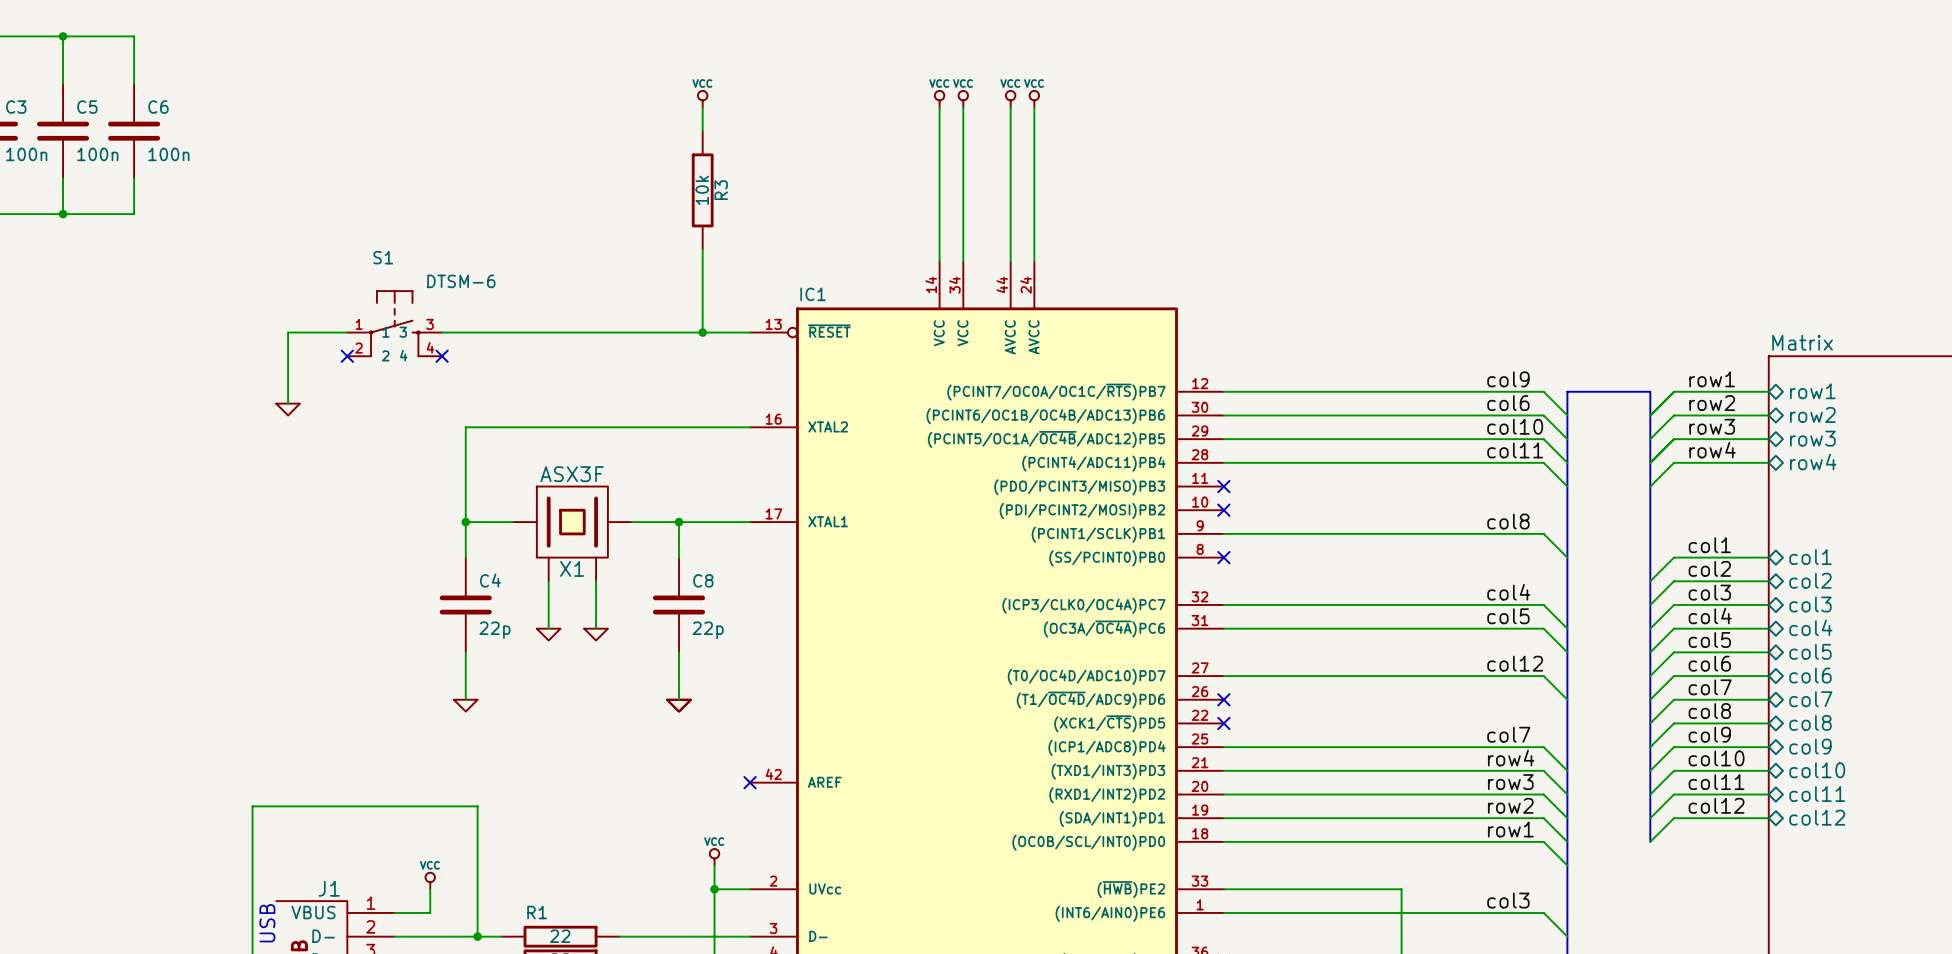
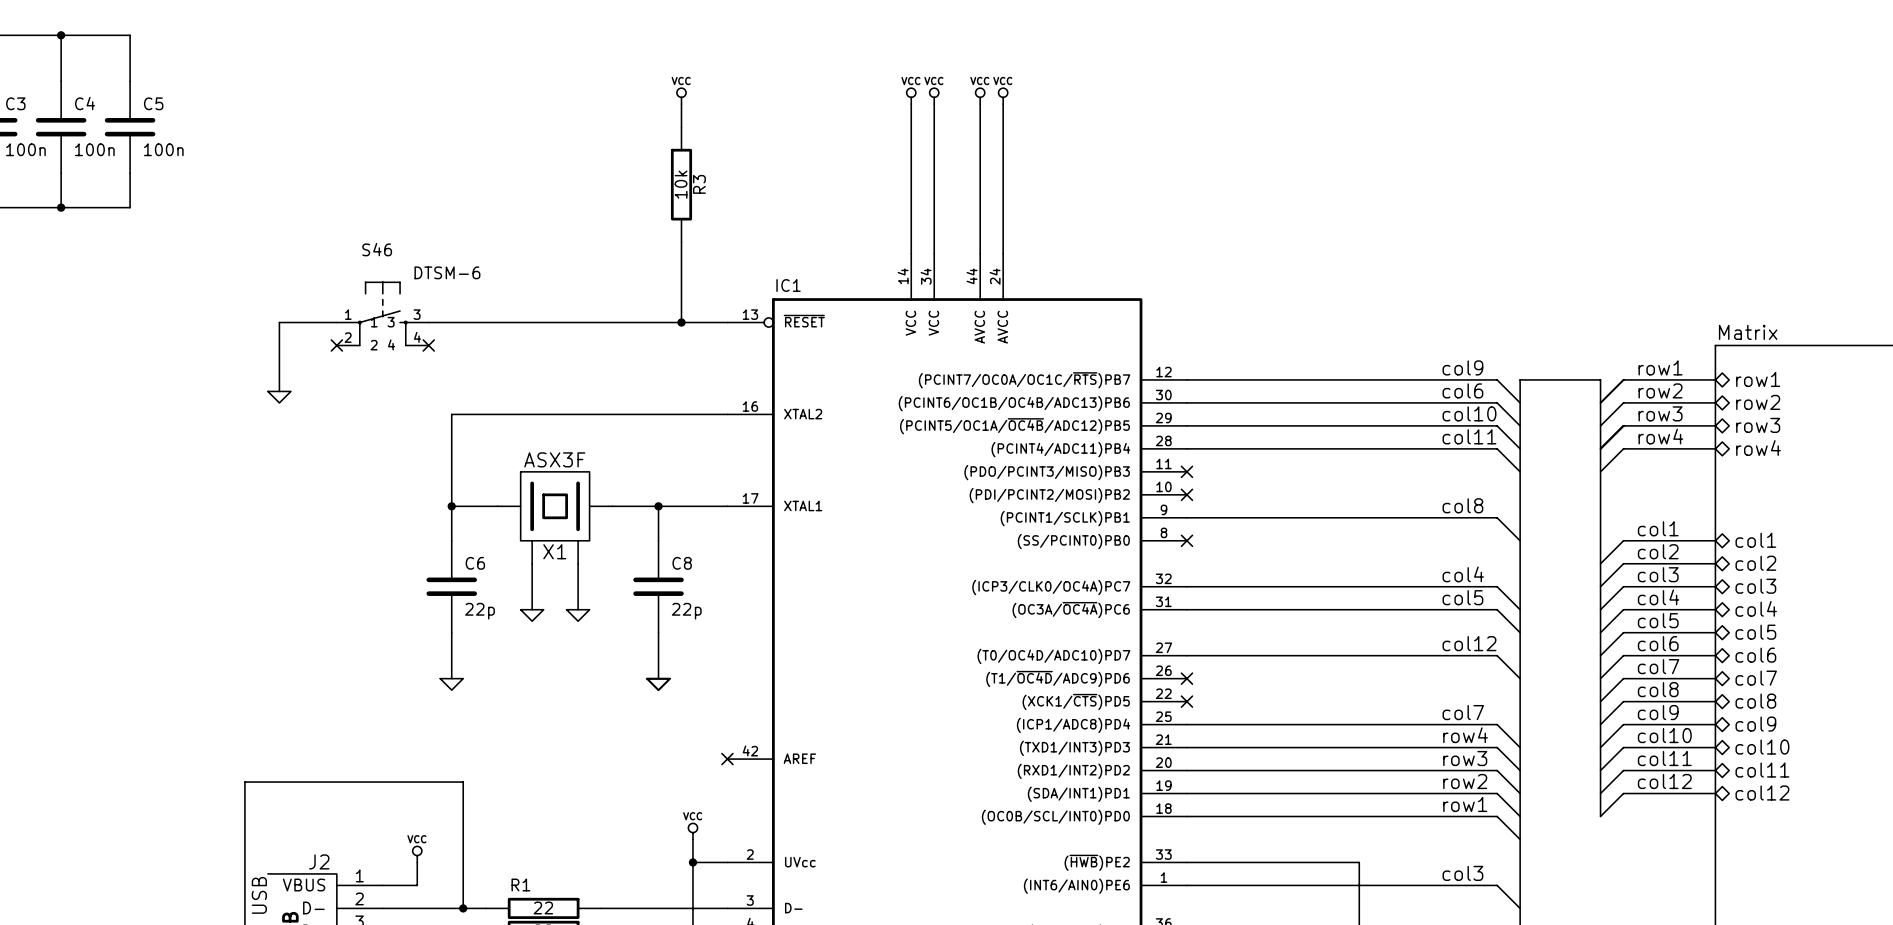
C5 name: C5 (87, 107) -> C4 (85, 103)
C6 name: C6 (158, 107) -> C5 (153, 103)
S1 name: S1 (383, 257) -> S46 (377, 249)
C4 name: C4 (490, 580) -> C6 (475, 563)
J1 name: J1 (329, 888) -> J2 (319, 861)

